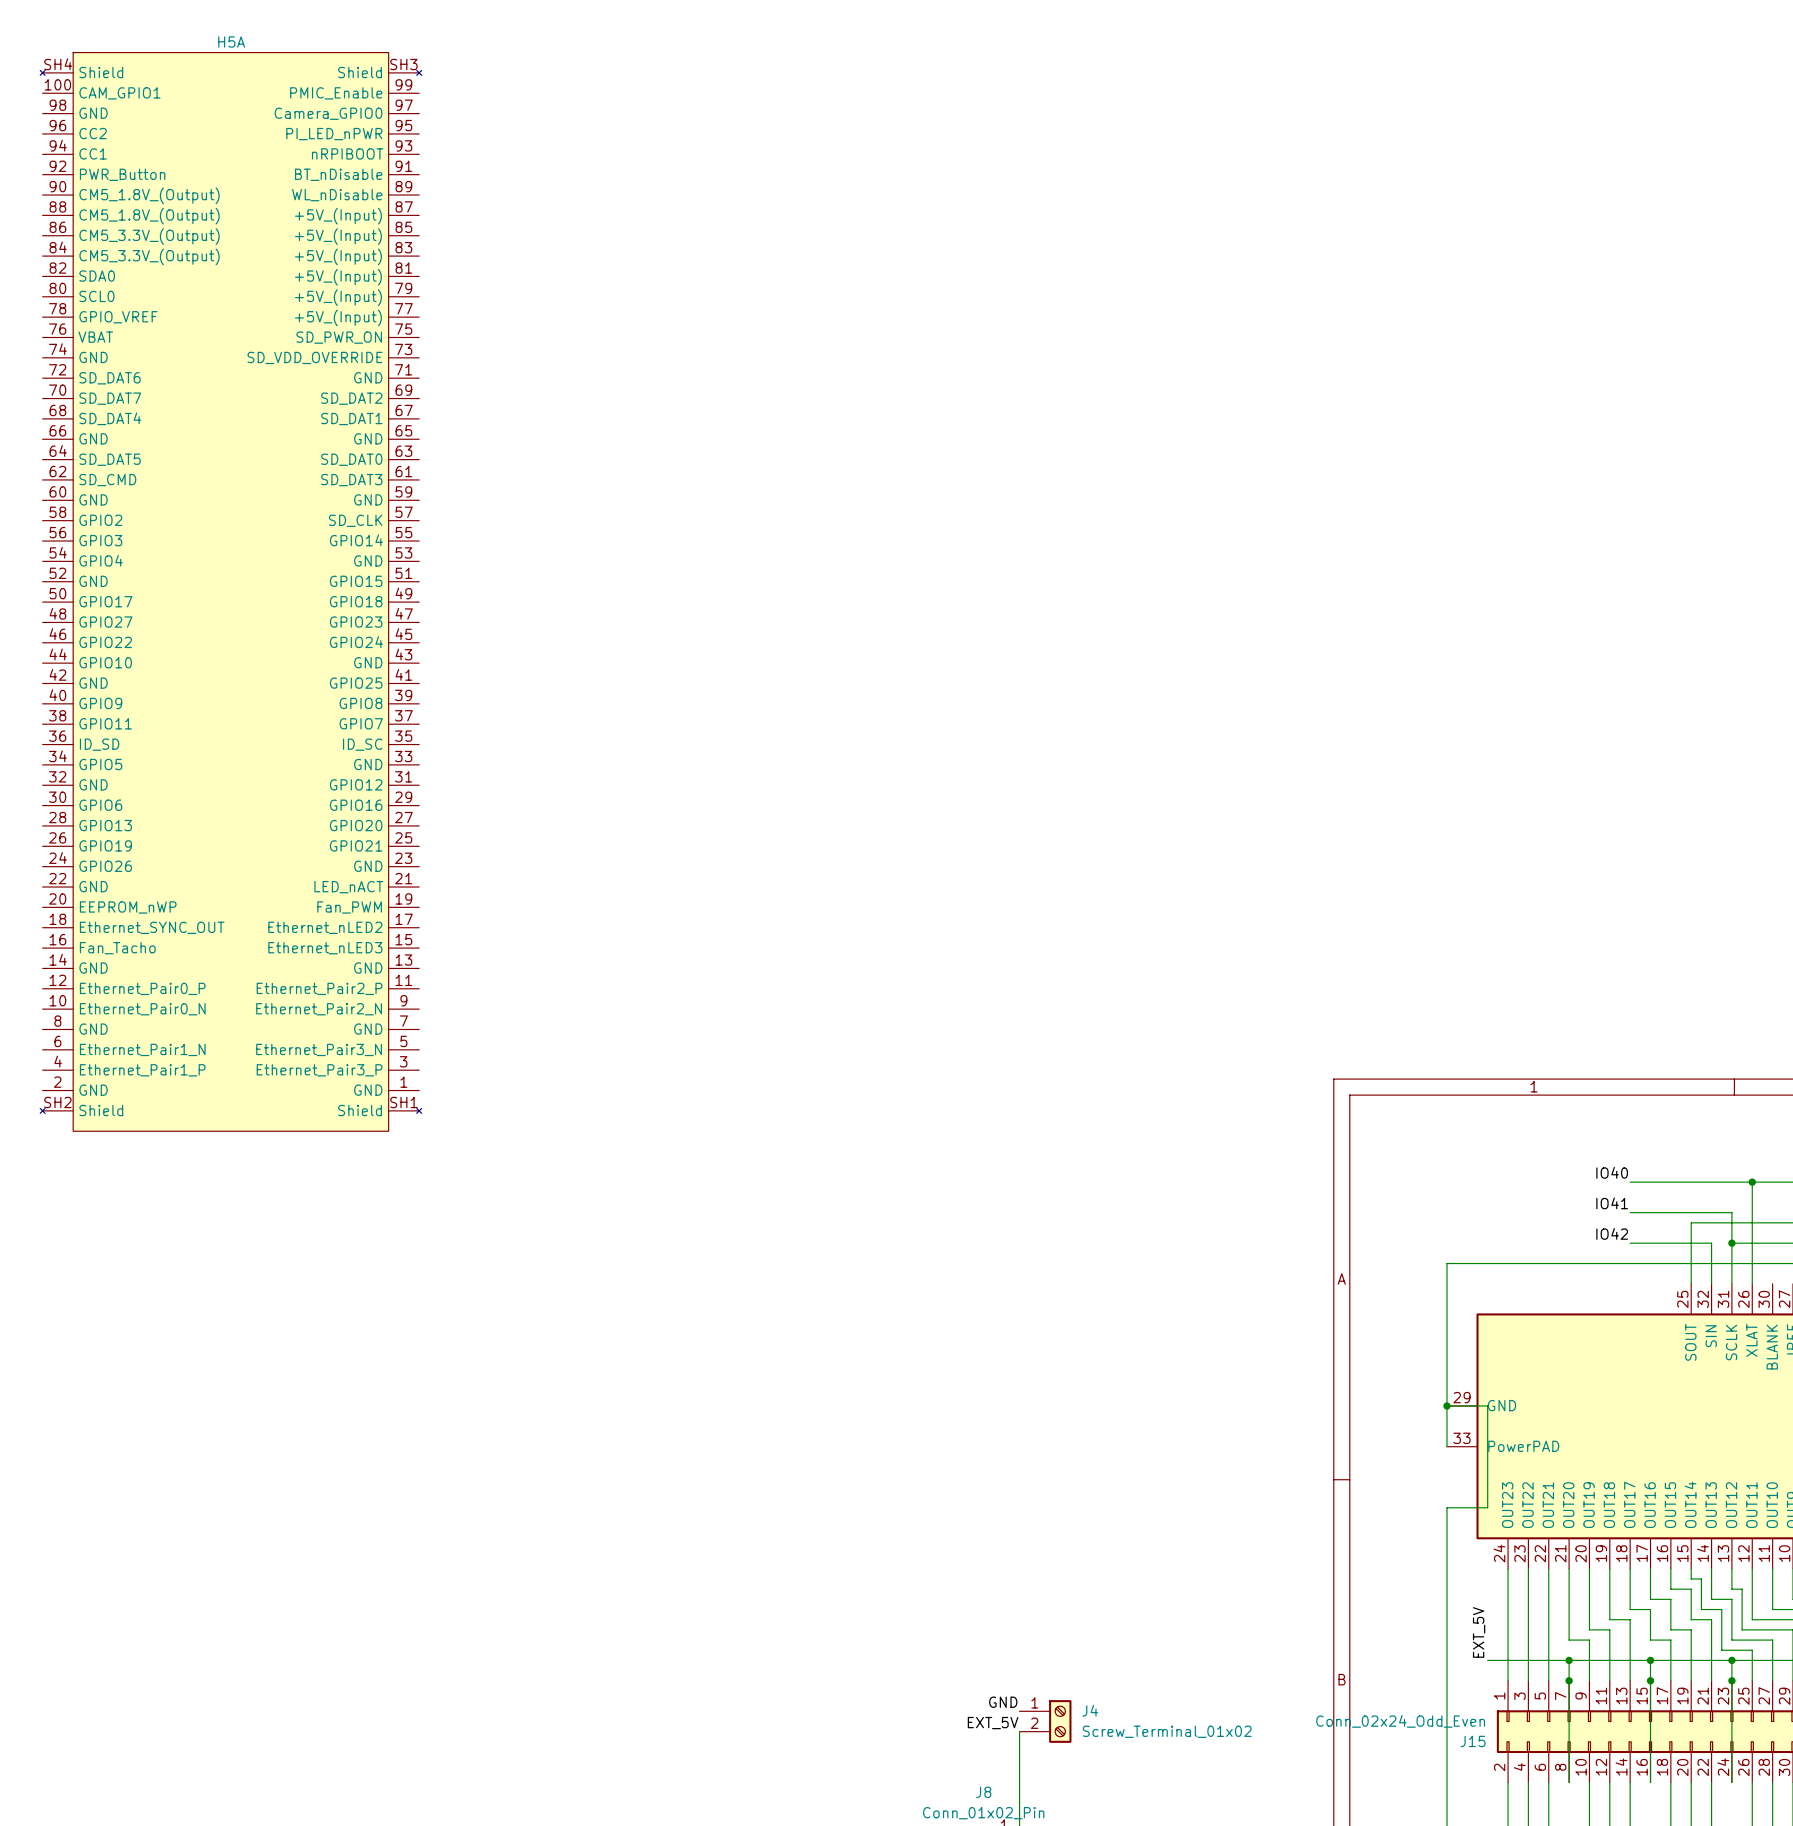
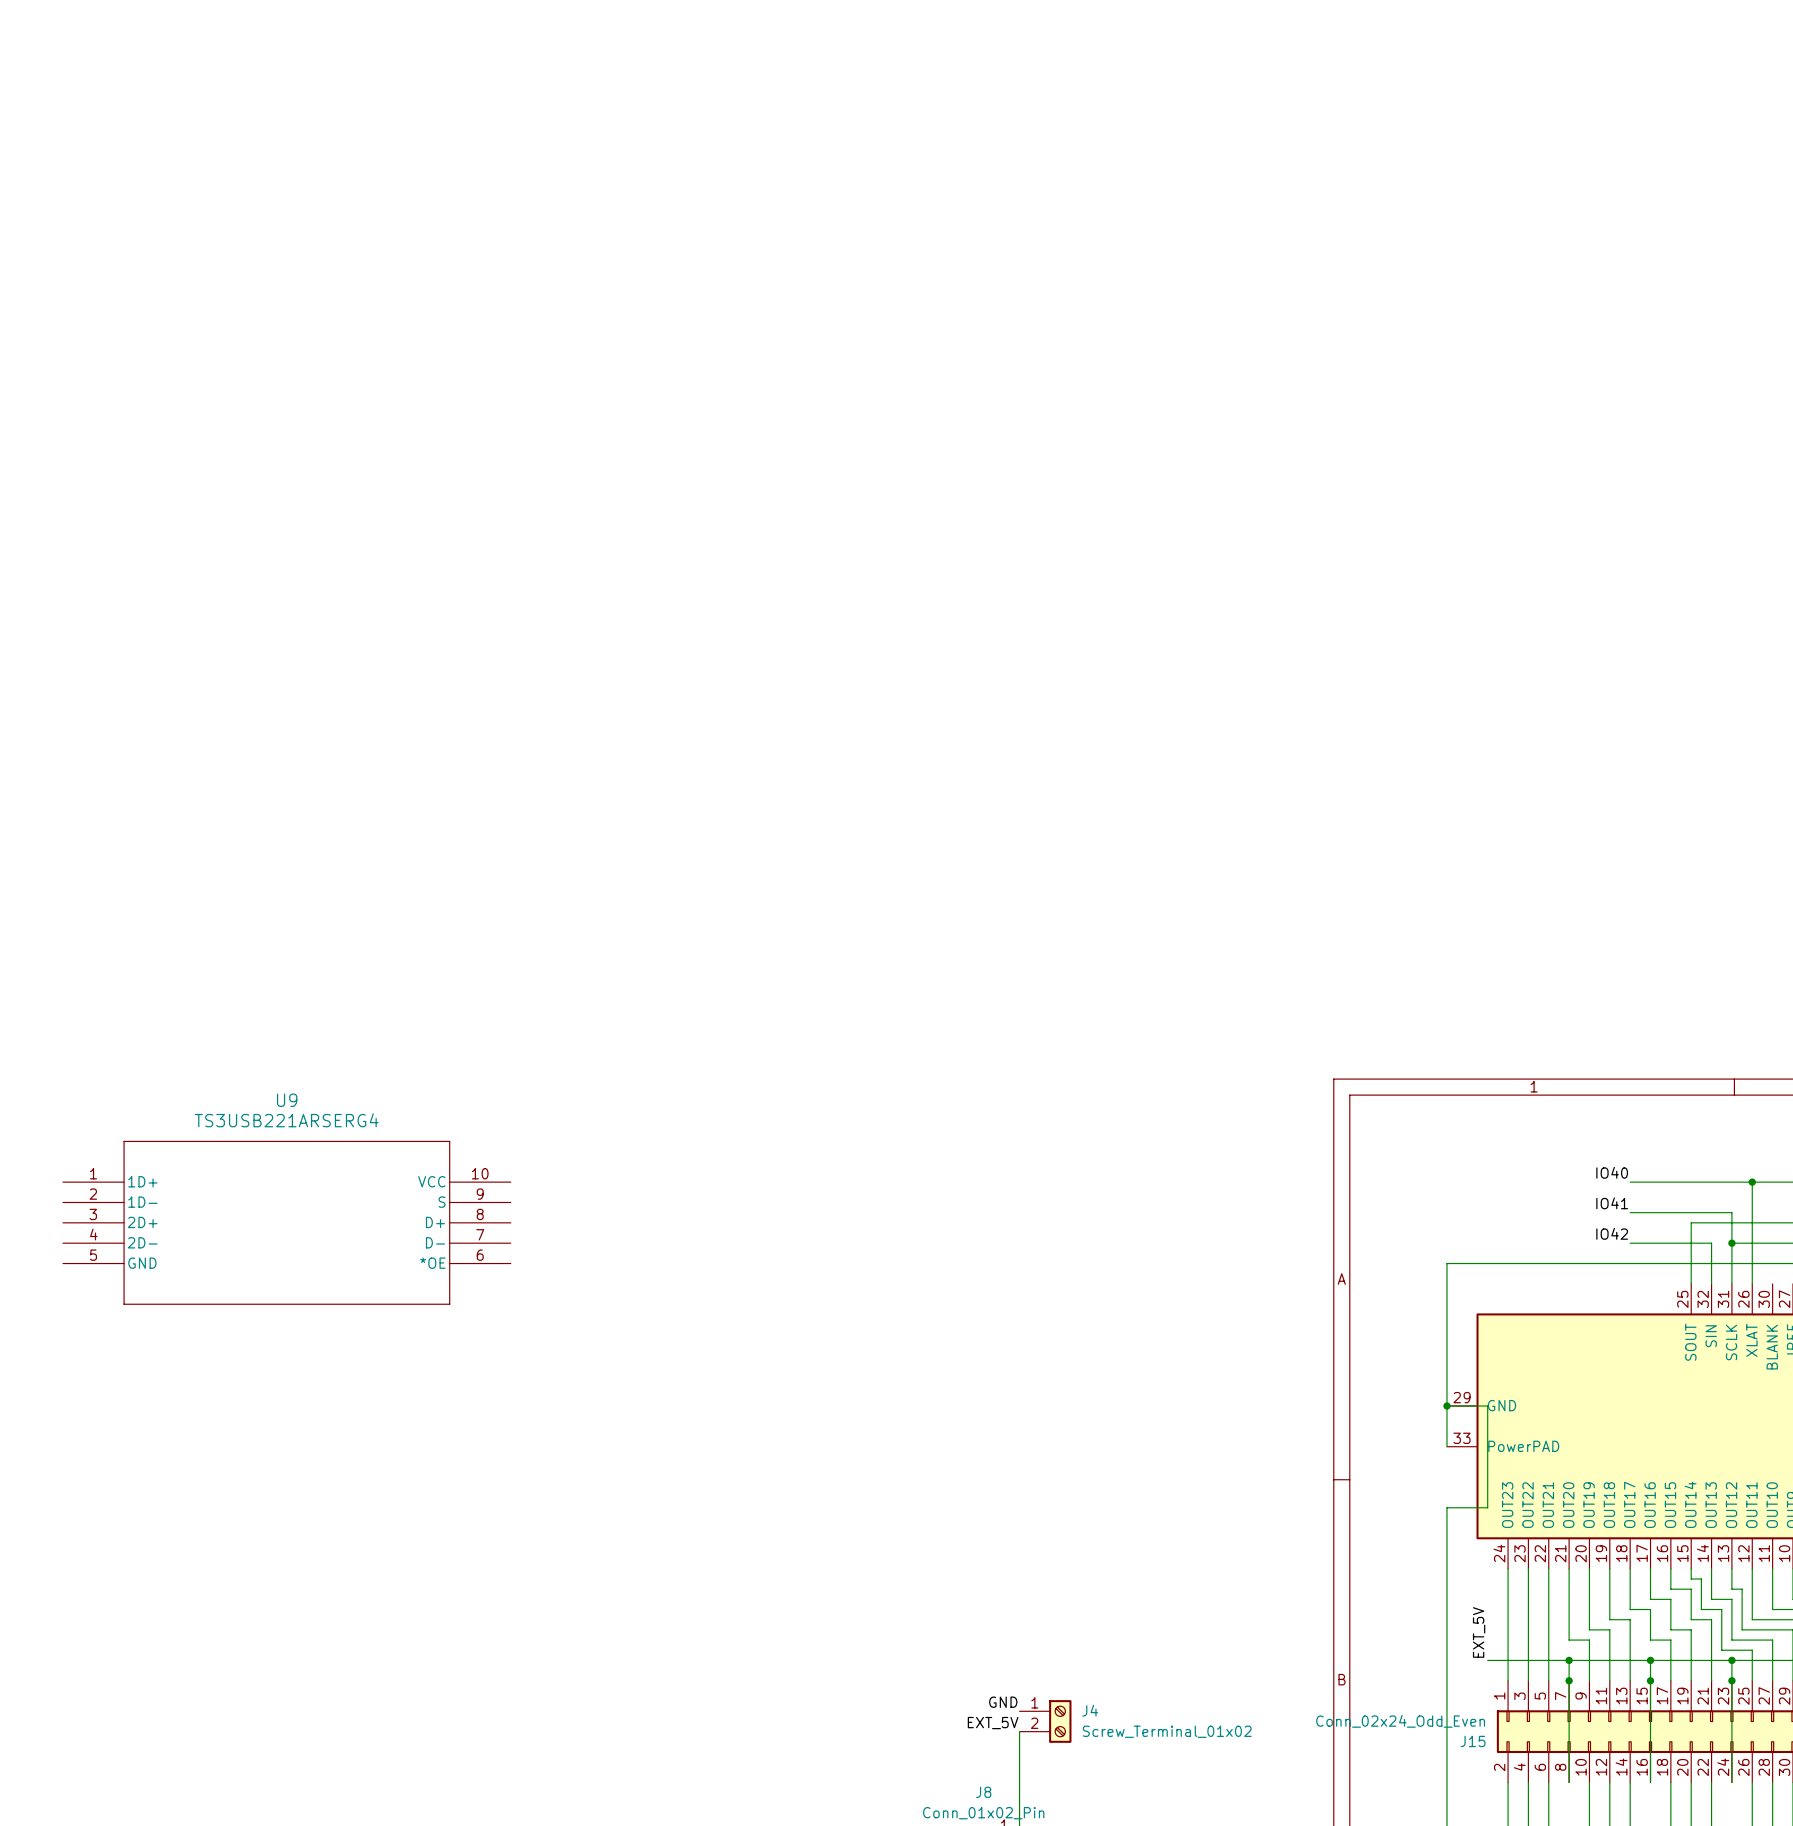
H5A: (230, 591) -> none
U9: none -> TS3USB221ARSERG4 (286, 1222)

